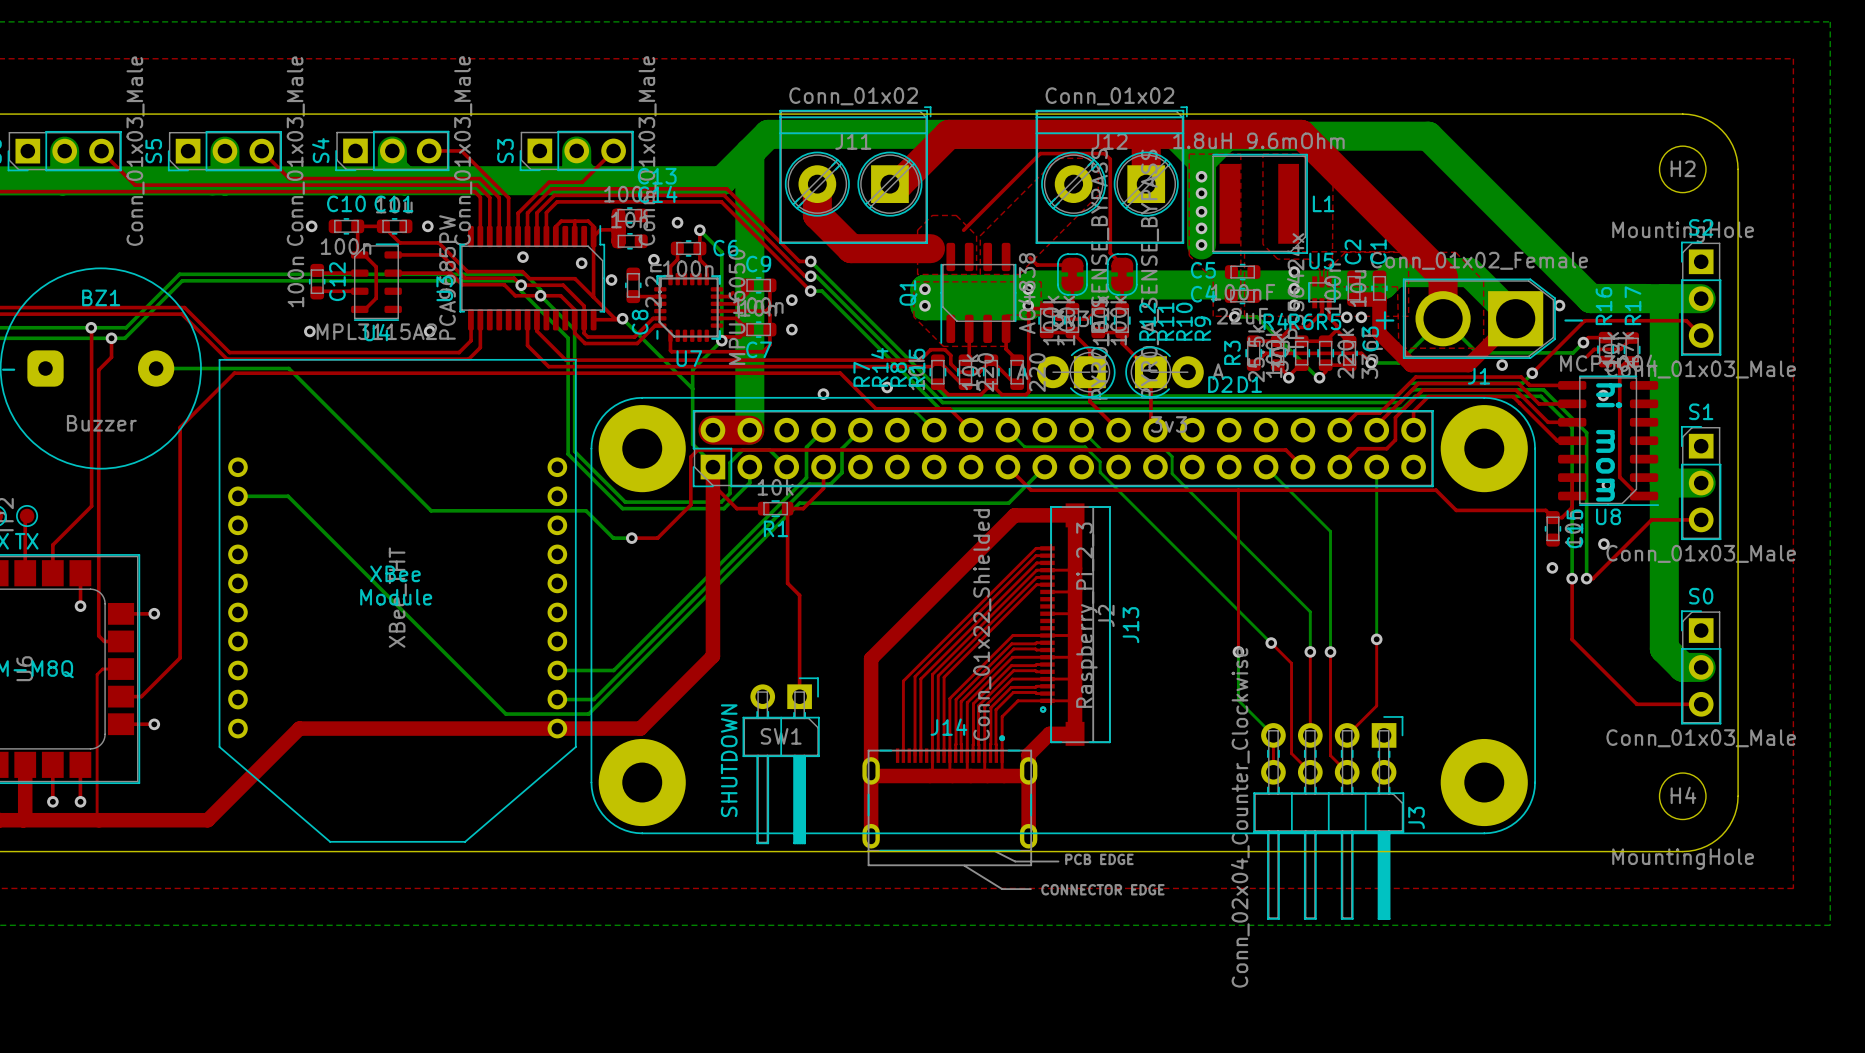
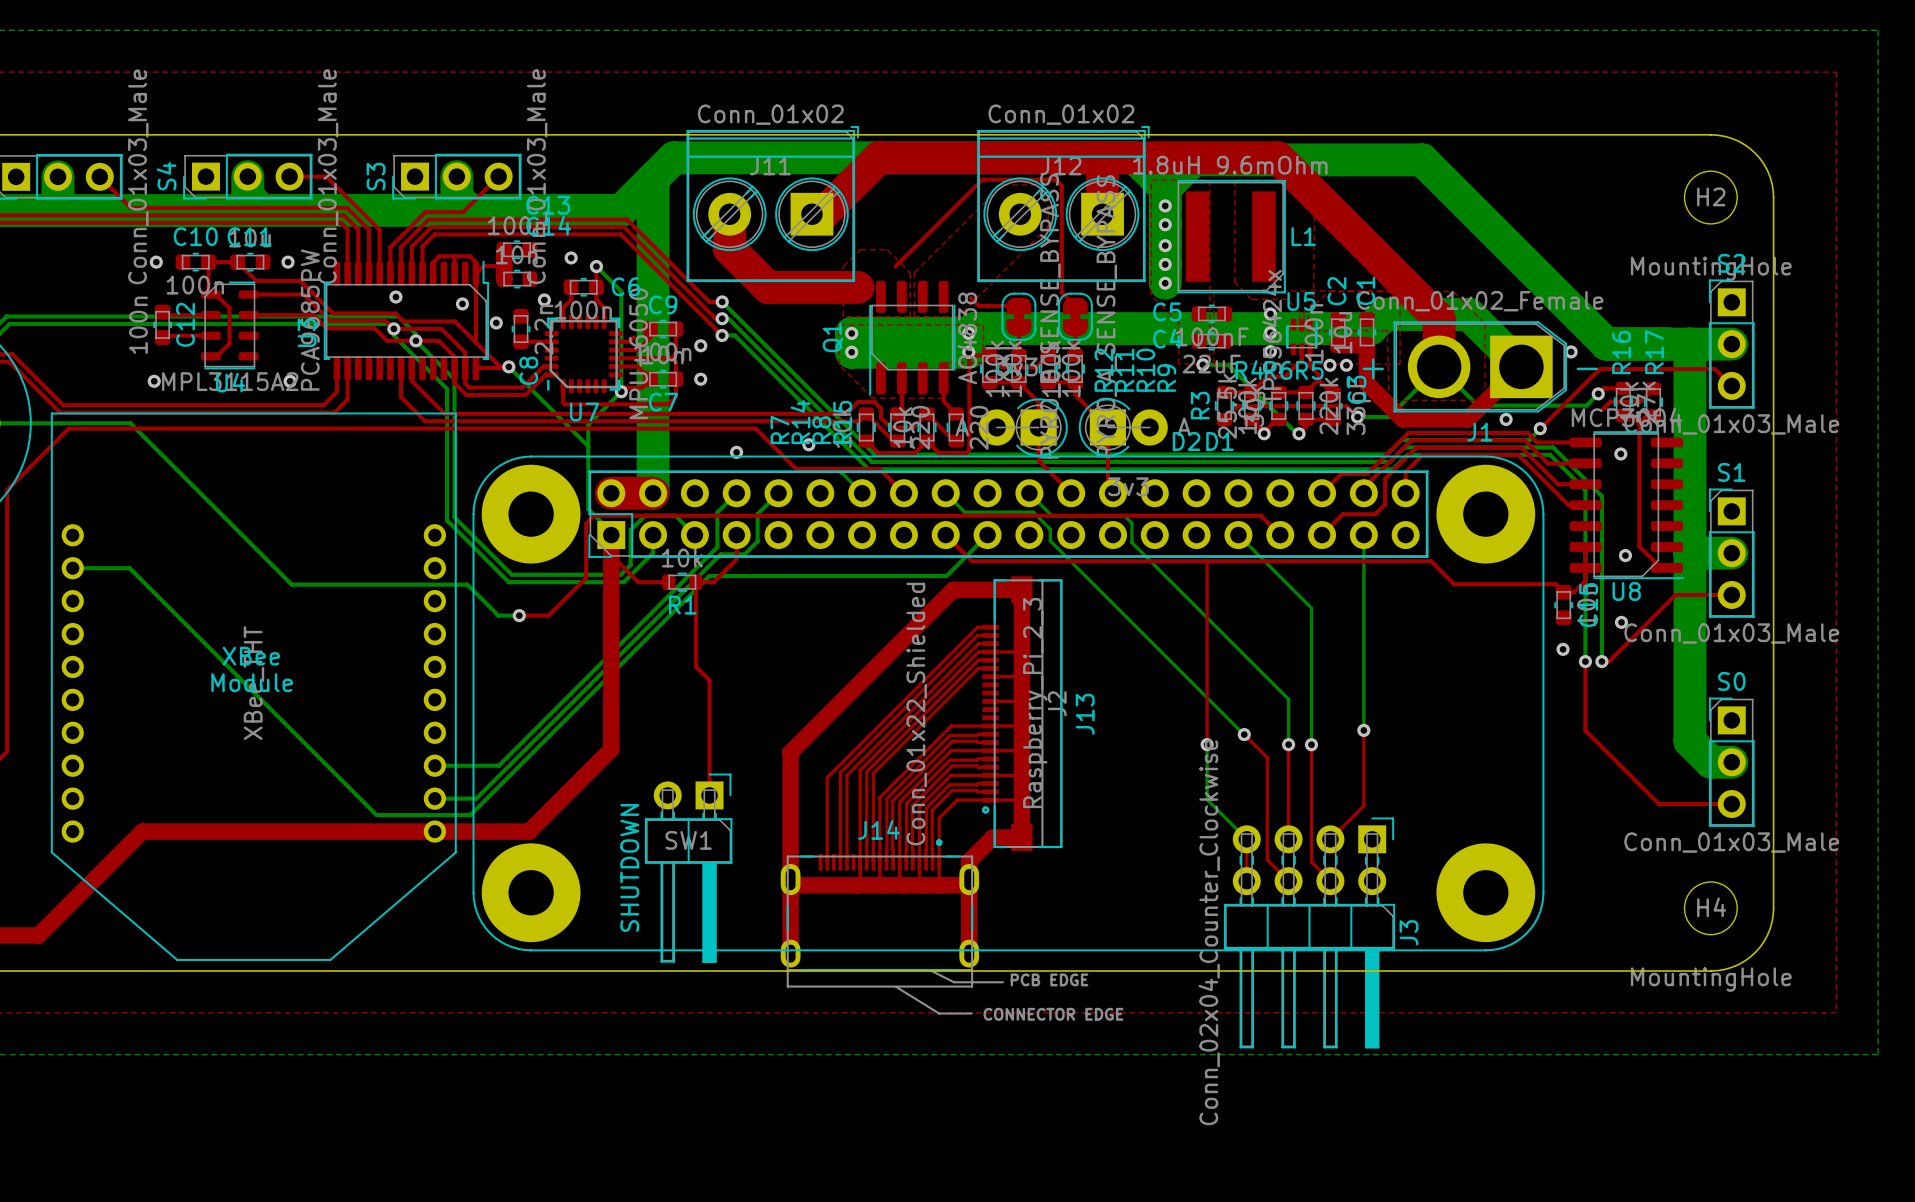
text: hi mom (1609, 442) -> none

